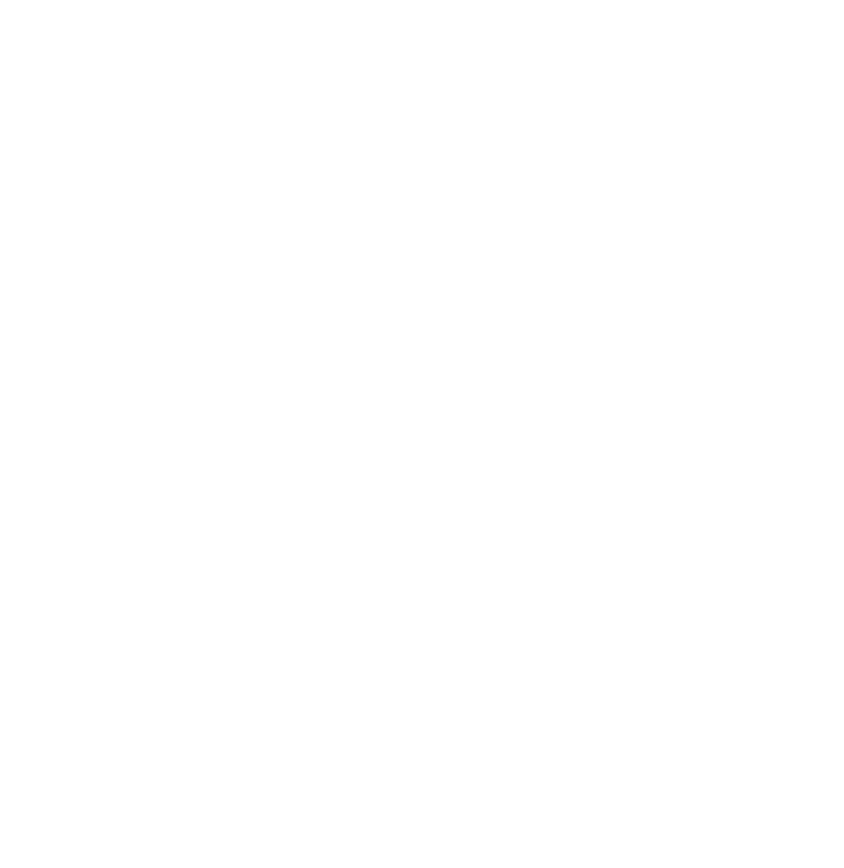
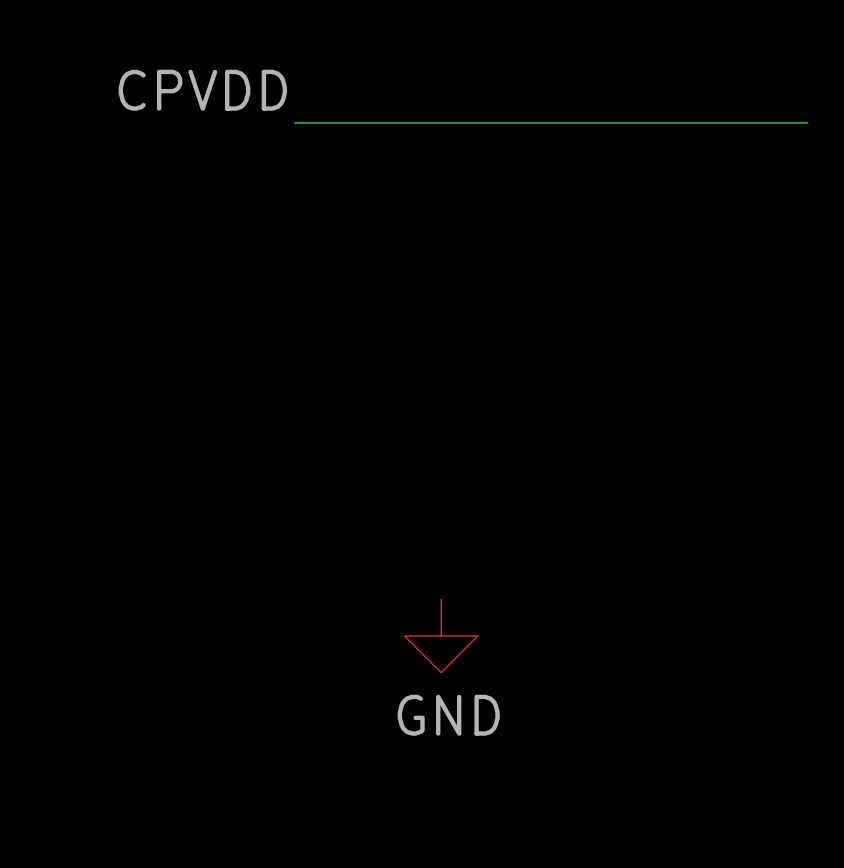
label: none -> CPVDD (202, 90)
wire: none -> (294, 122) (807, 122)
power symbol: none -> GND (441, 635)

